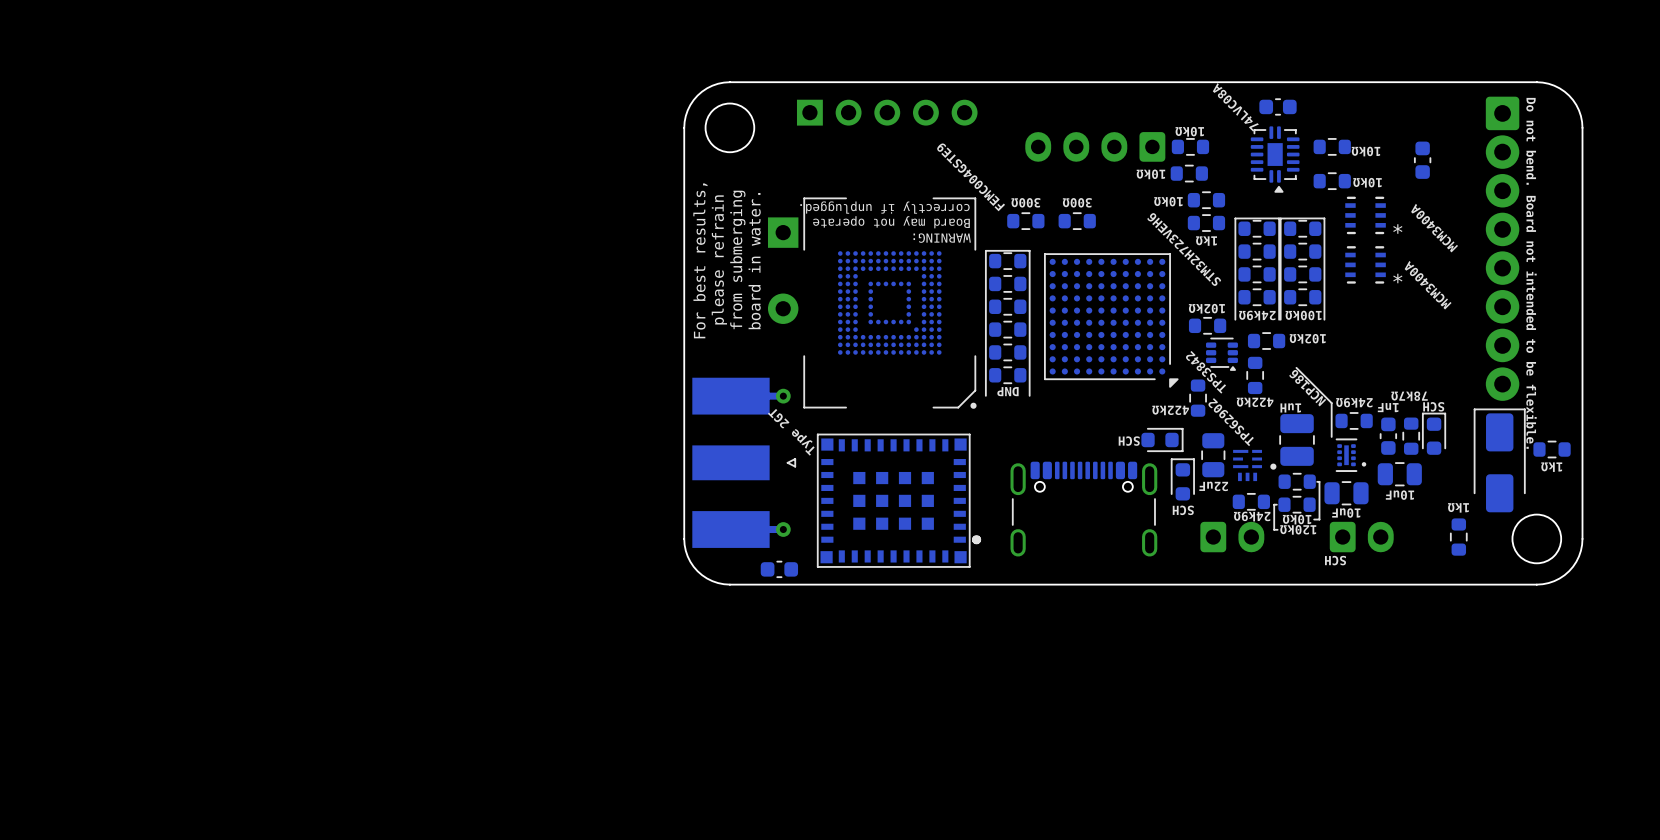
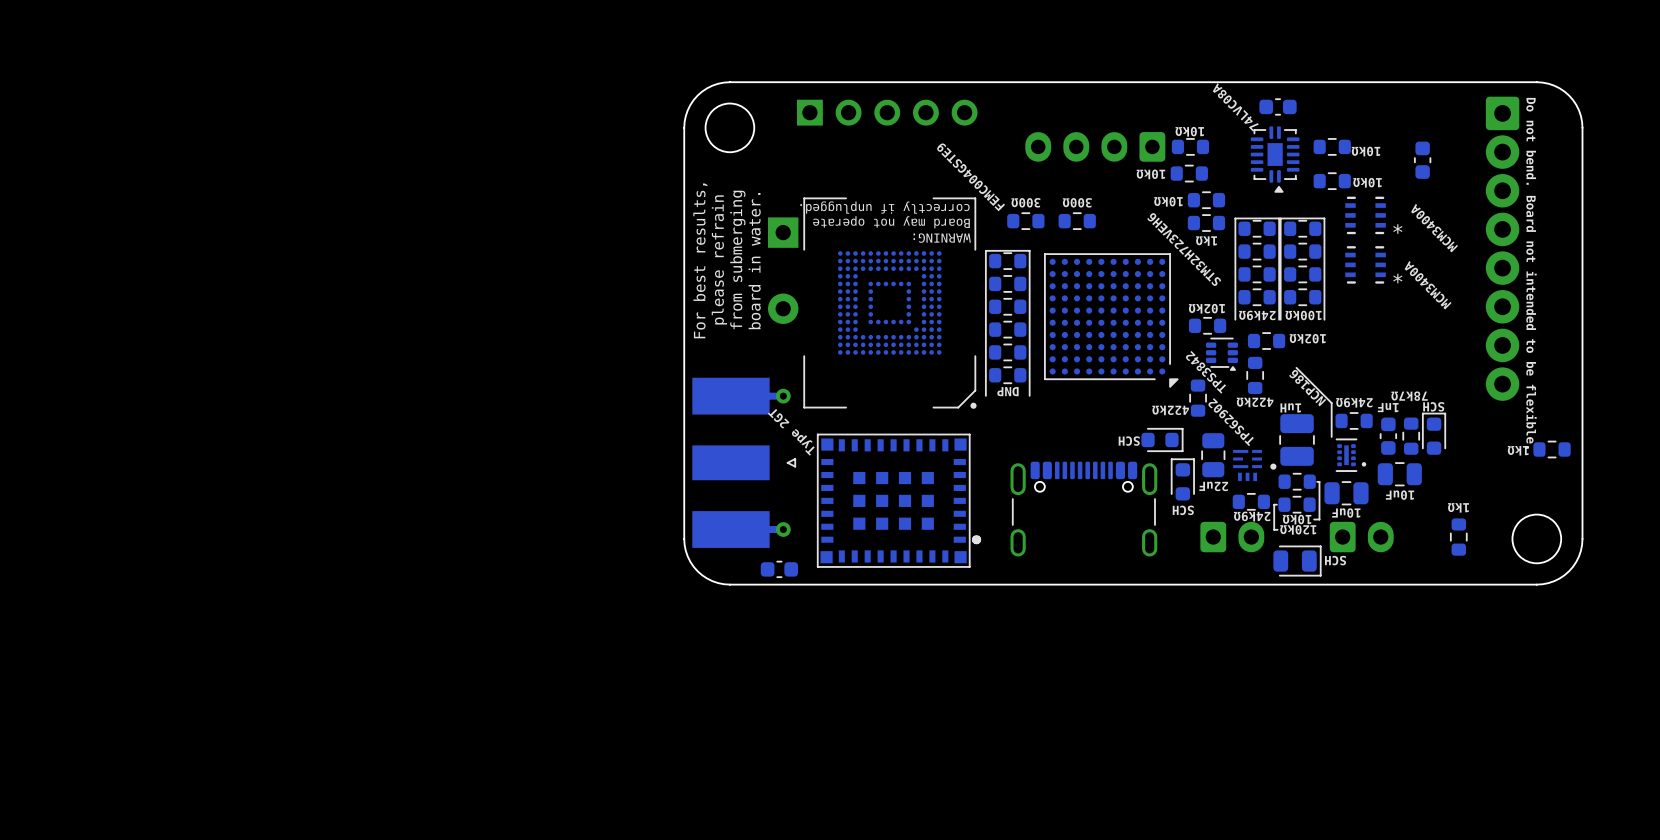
part: (1499, 460) -> none
text position: 1kΩ (1551, 467) -> 1kΩ (1518, 450)
part: none -> (1297, 561)

